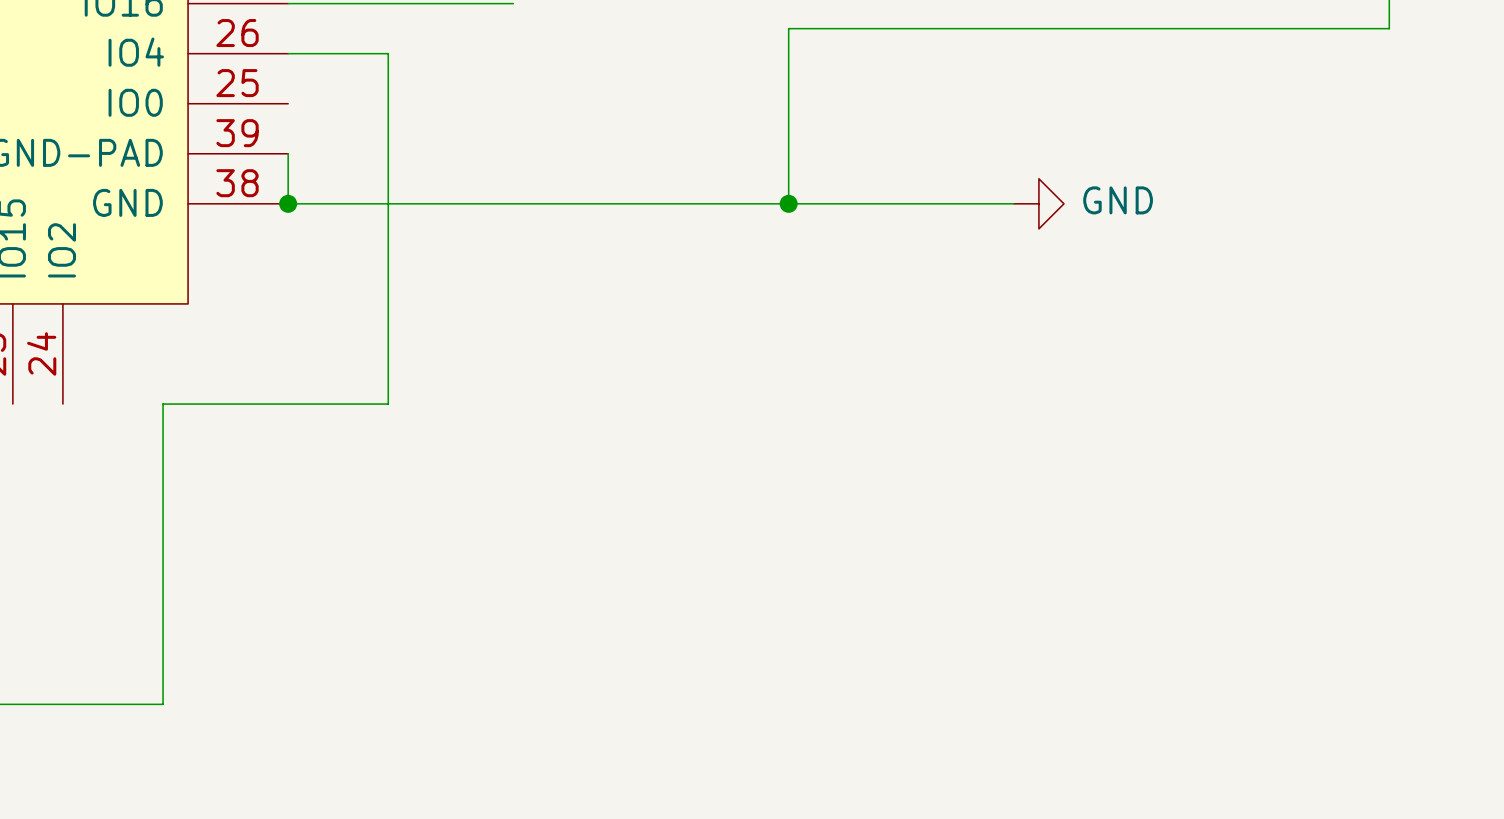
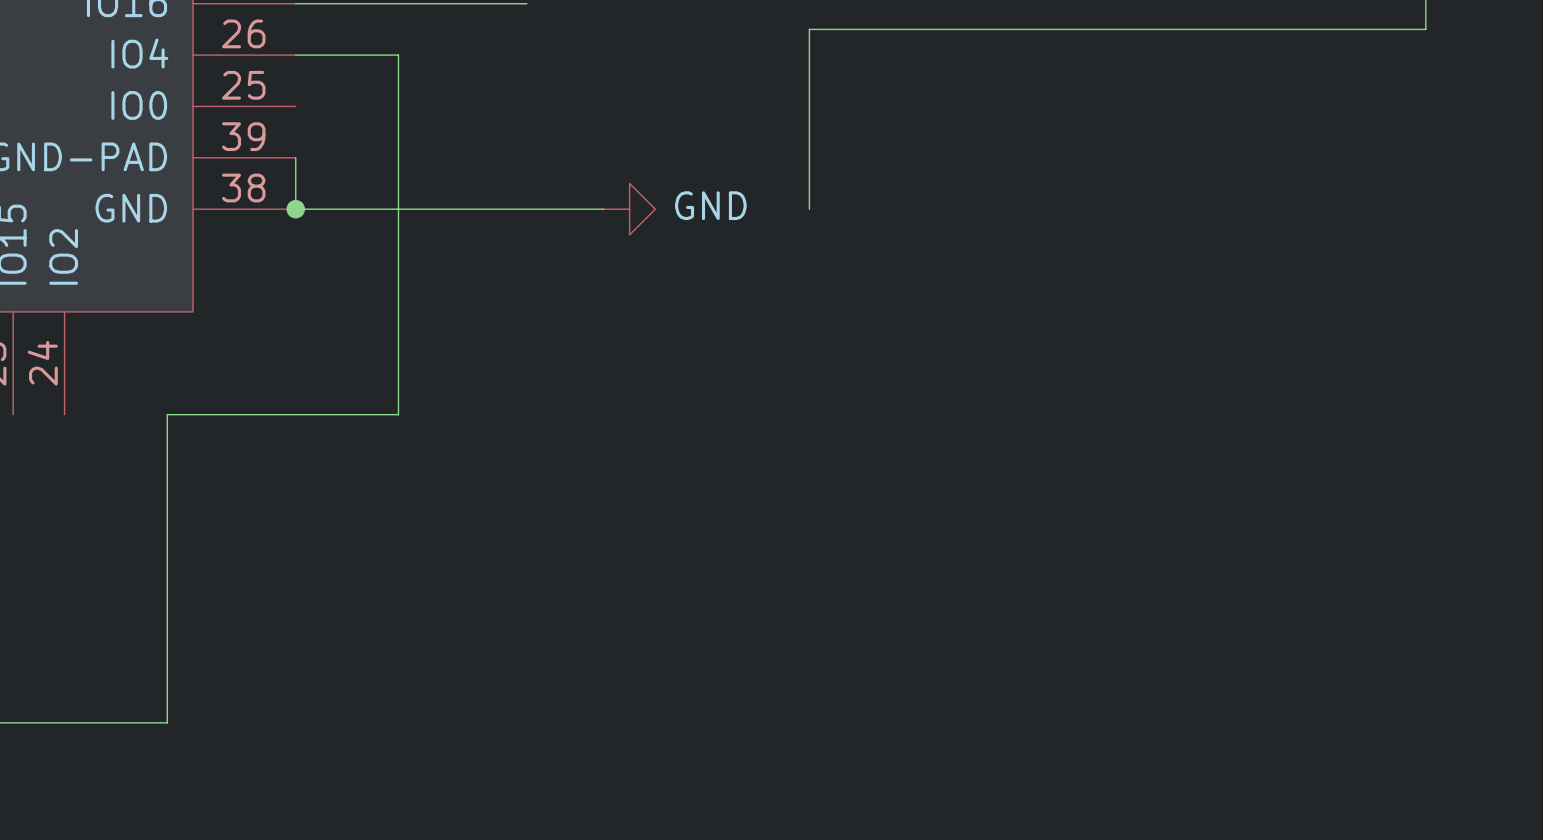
wire: (588, 203) (1013, 203) -> none
junction: (788, 203) -> none
power symbol position: GND (1038, 203) -> GND (629, 209)

